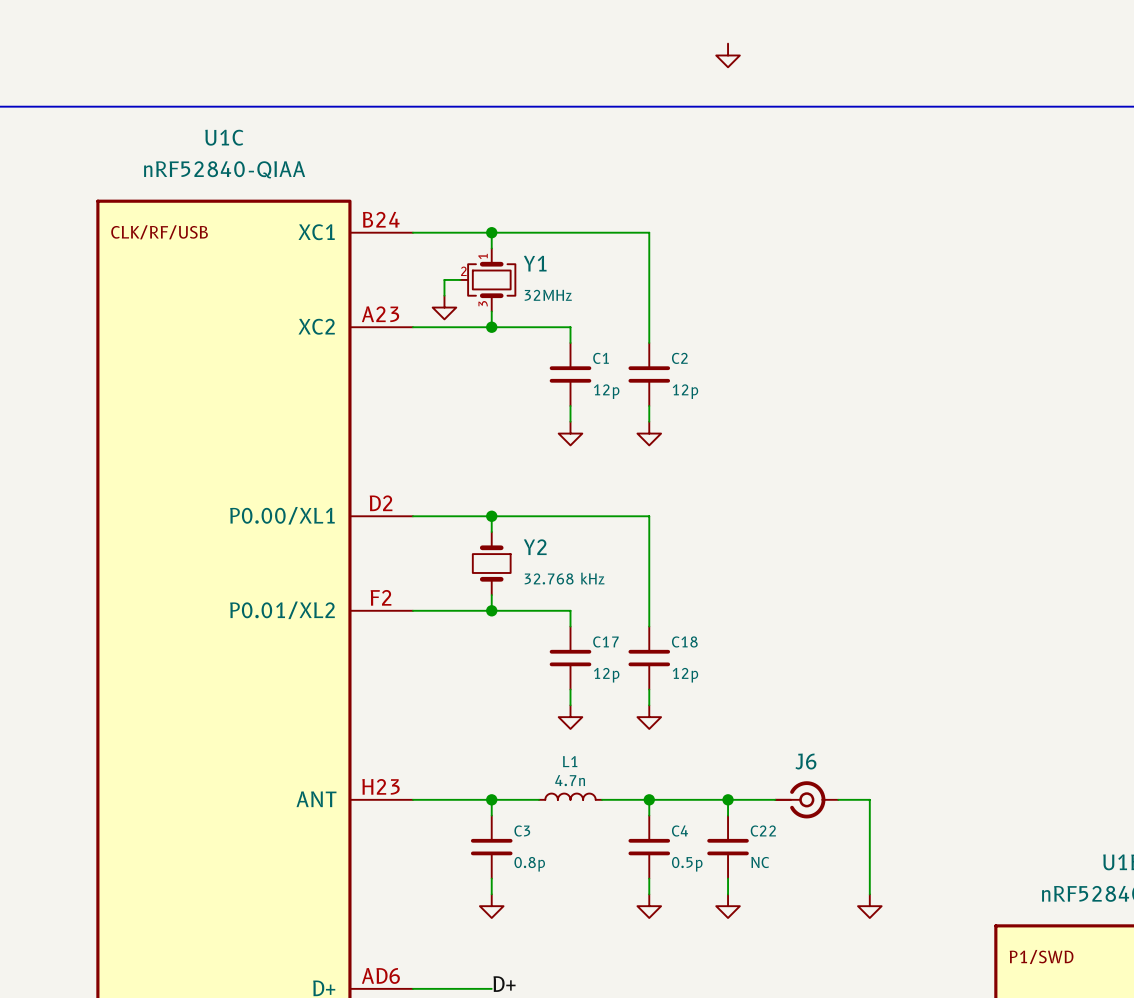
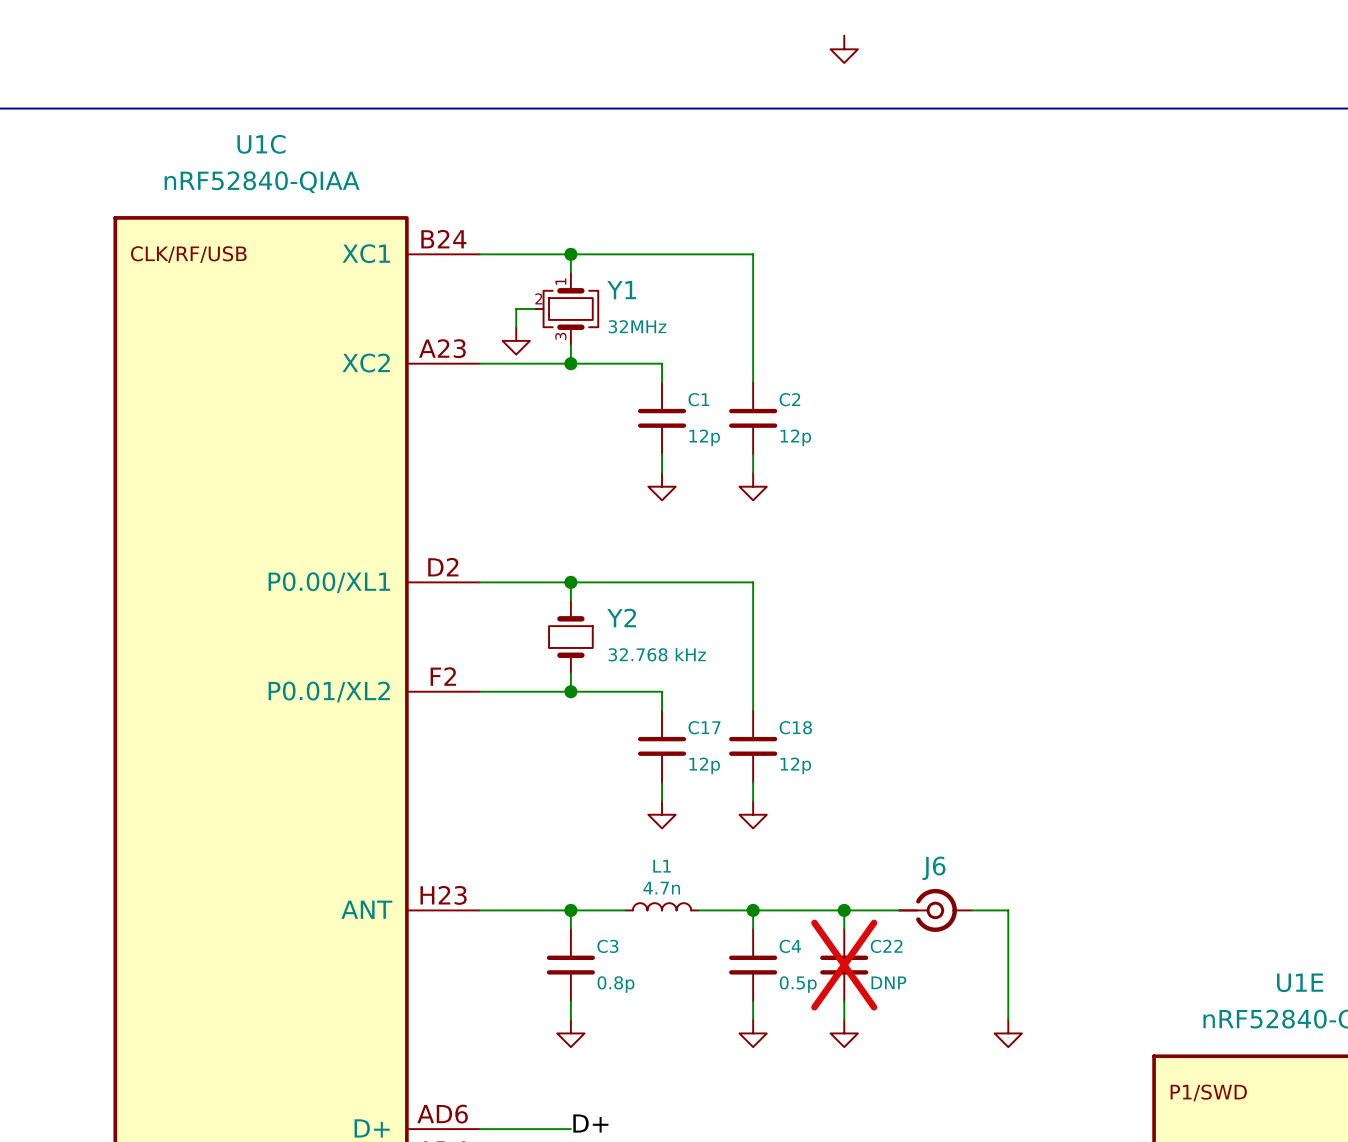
C22 do-not-place cross: none -> (844, 965)
C22 value: NC (760, 862) -> DNP (888, 982)

